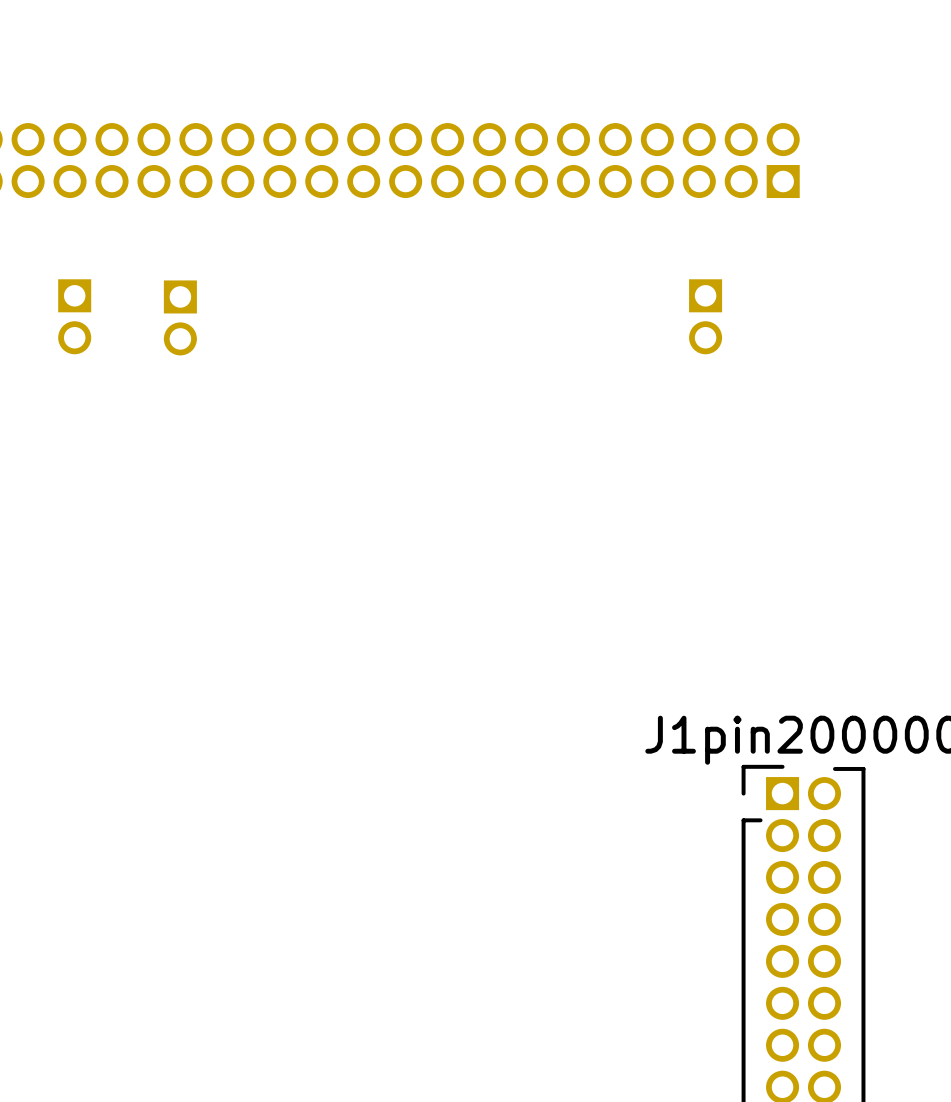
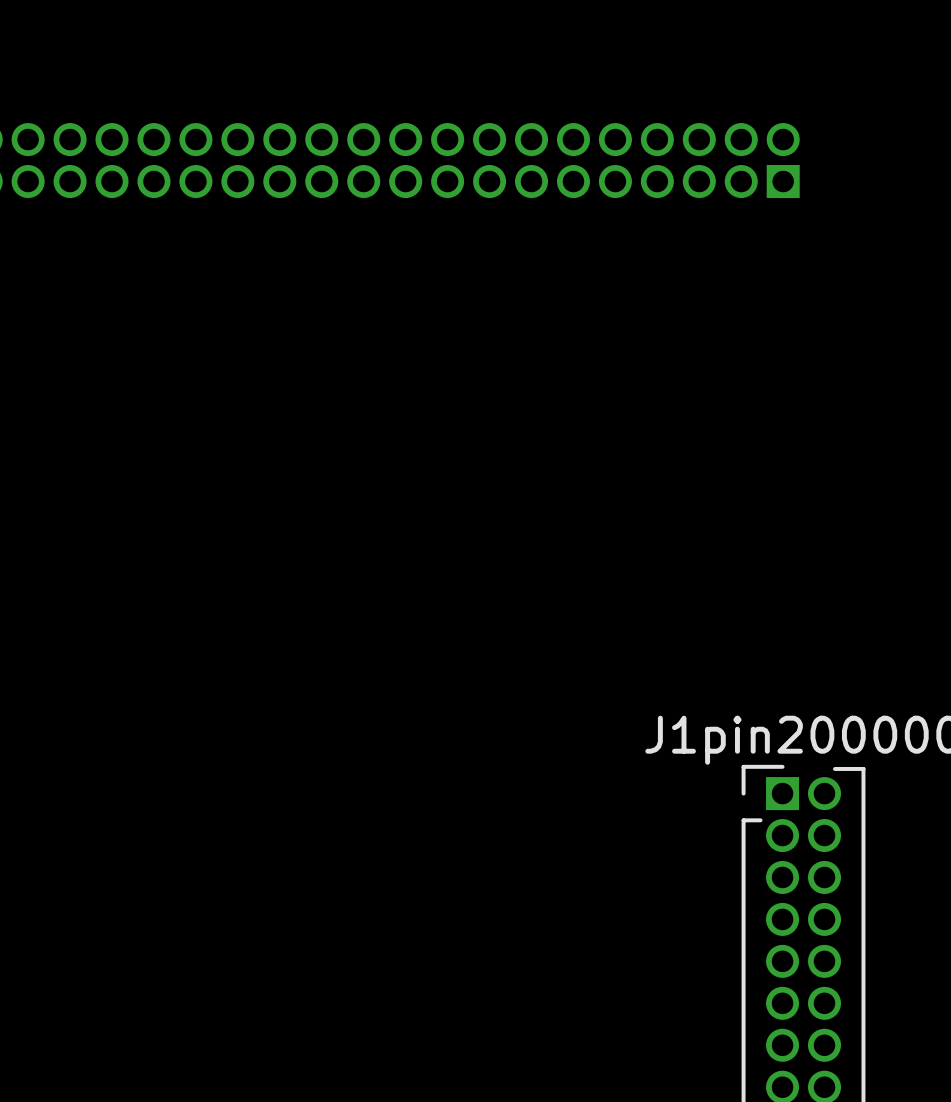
part: (74, 316) -> none
part: (705, 316) -> none
part: (180, 317) -> none

